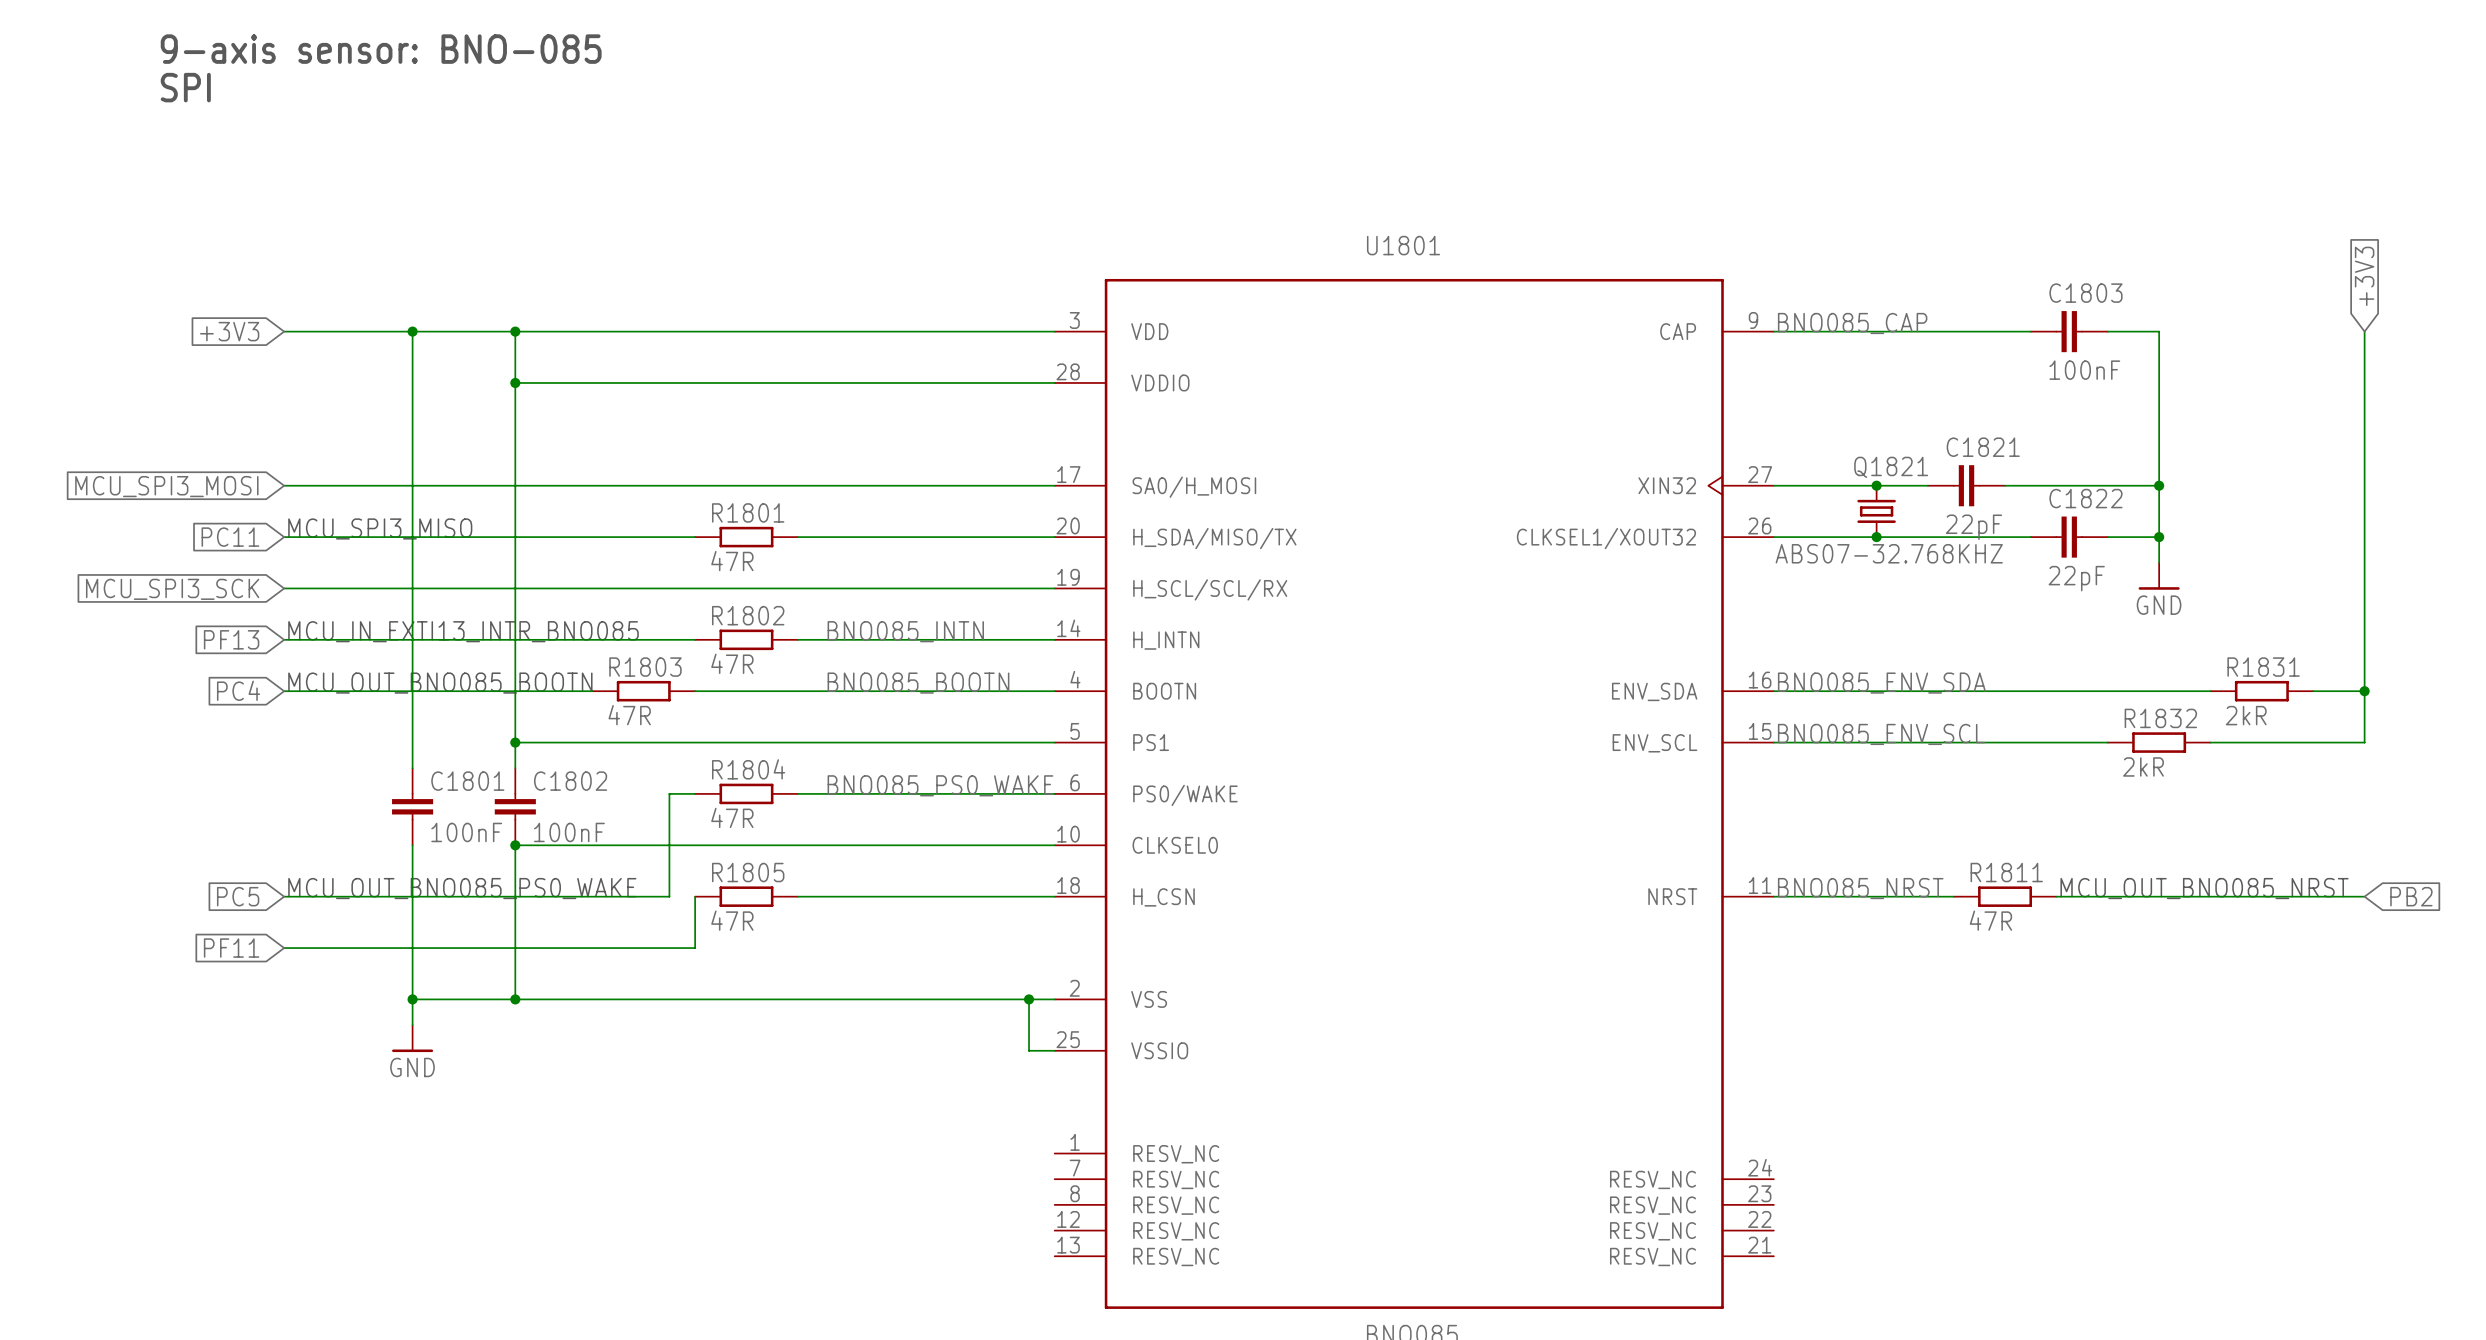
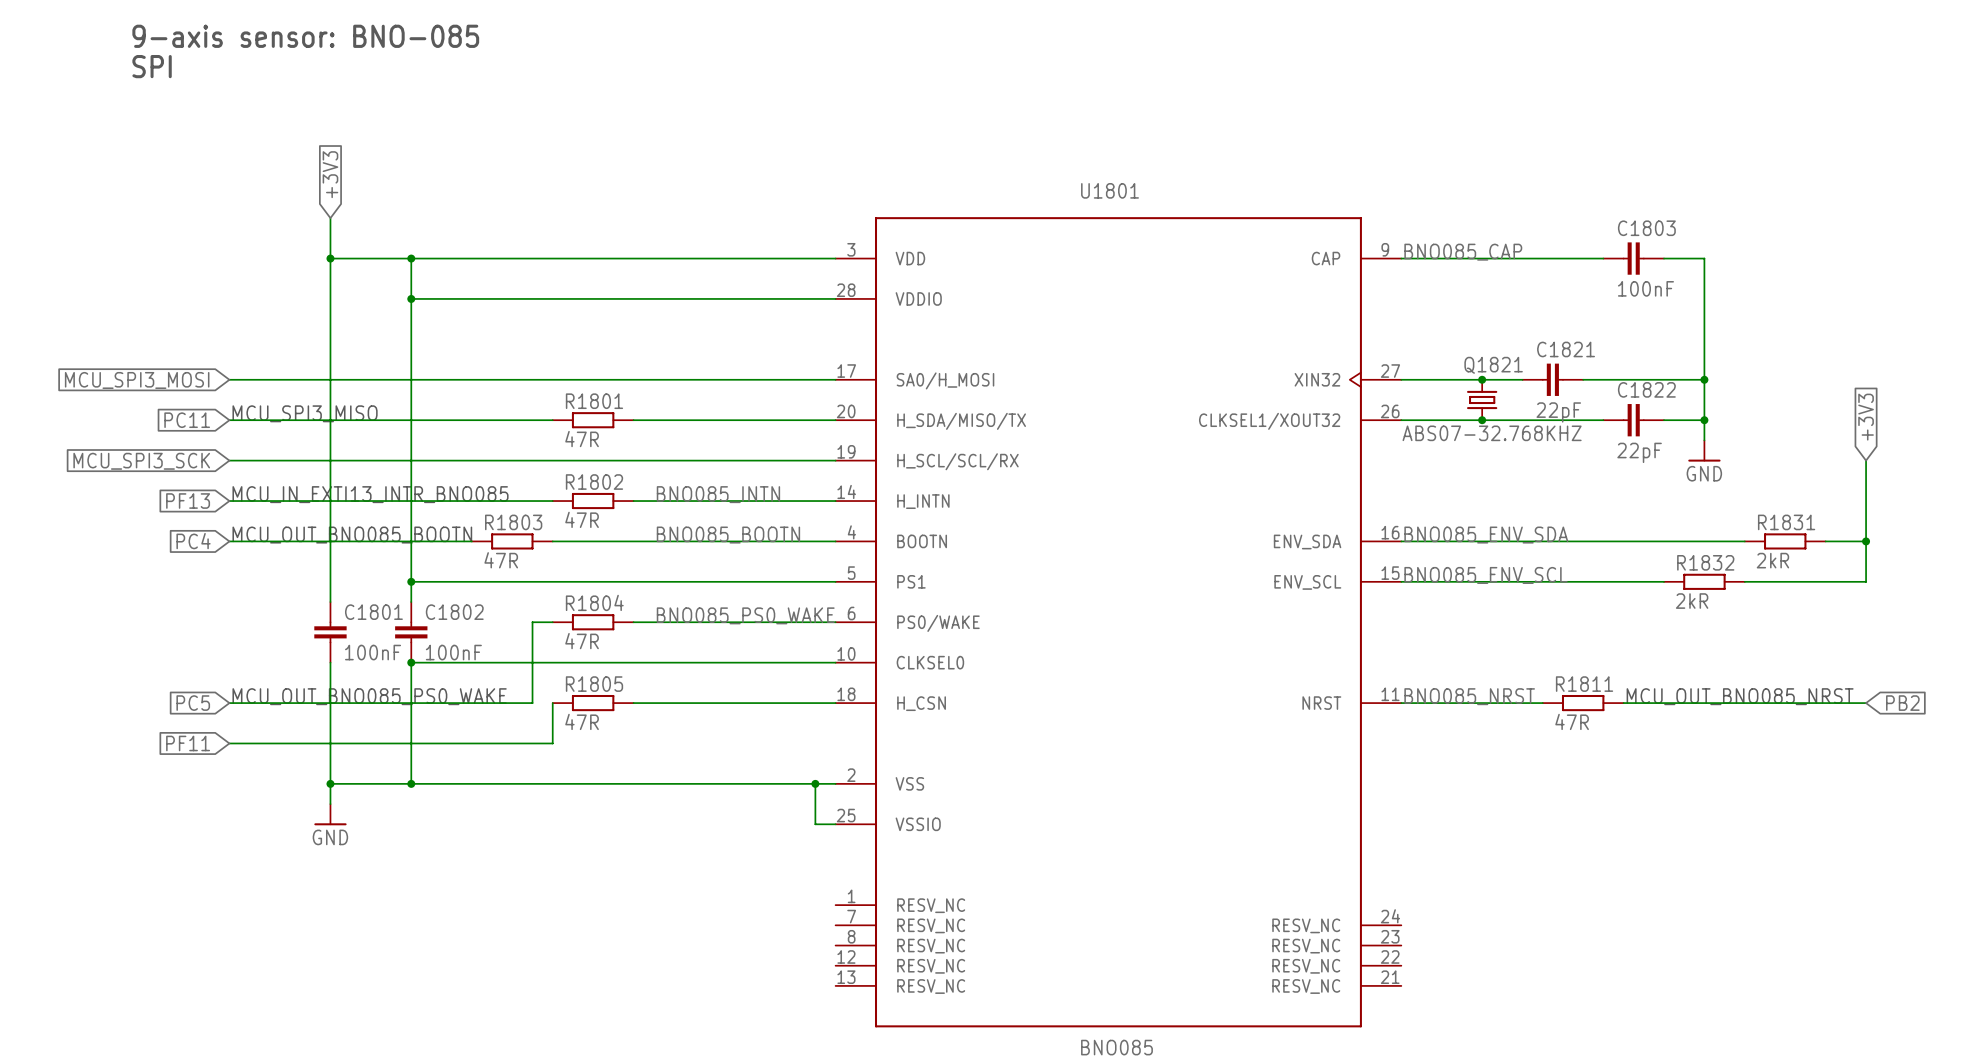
global label: +3V3 (2364, 276) -> none
global label rotation: 0° (229, 331) -> 90° clockwise (330, 174)
global label position: +3V3 (229, 331) -> +3V3 (330, 174)
wire: (284, 331) (412, 331) -> (330, 218) (330, 258)
wire: (2364, 331) (2364, 588) -> none
global label: none -> +3V3 (1866, 417)

